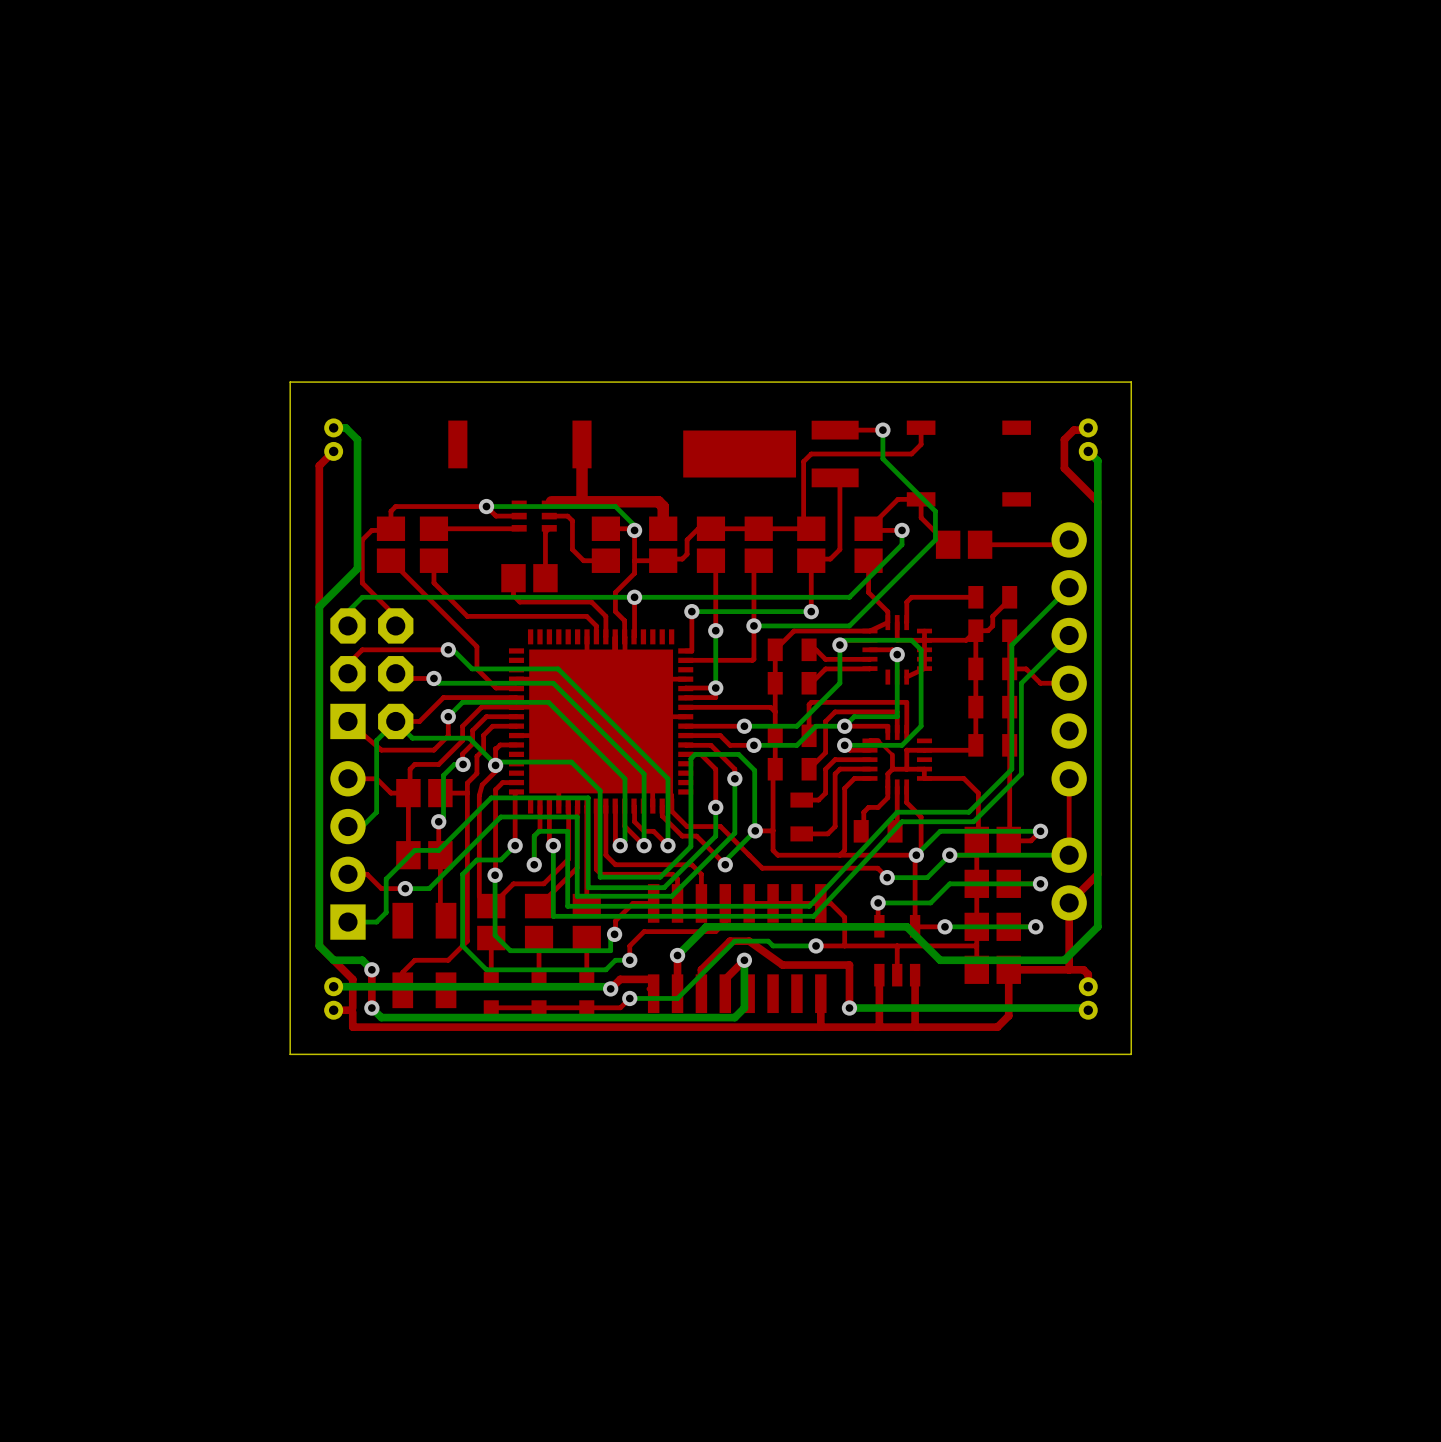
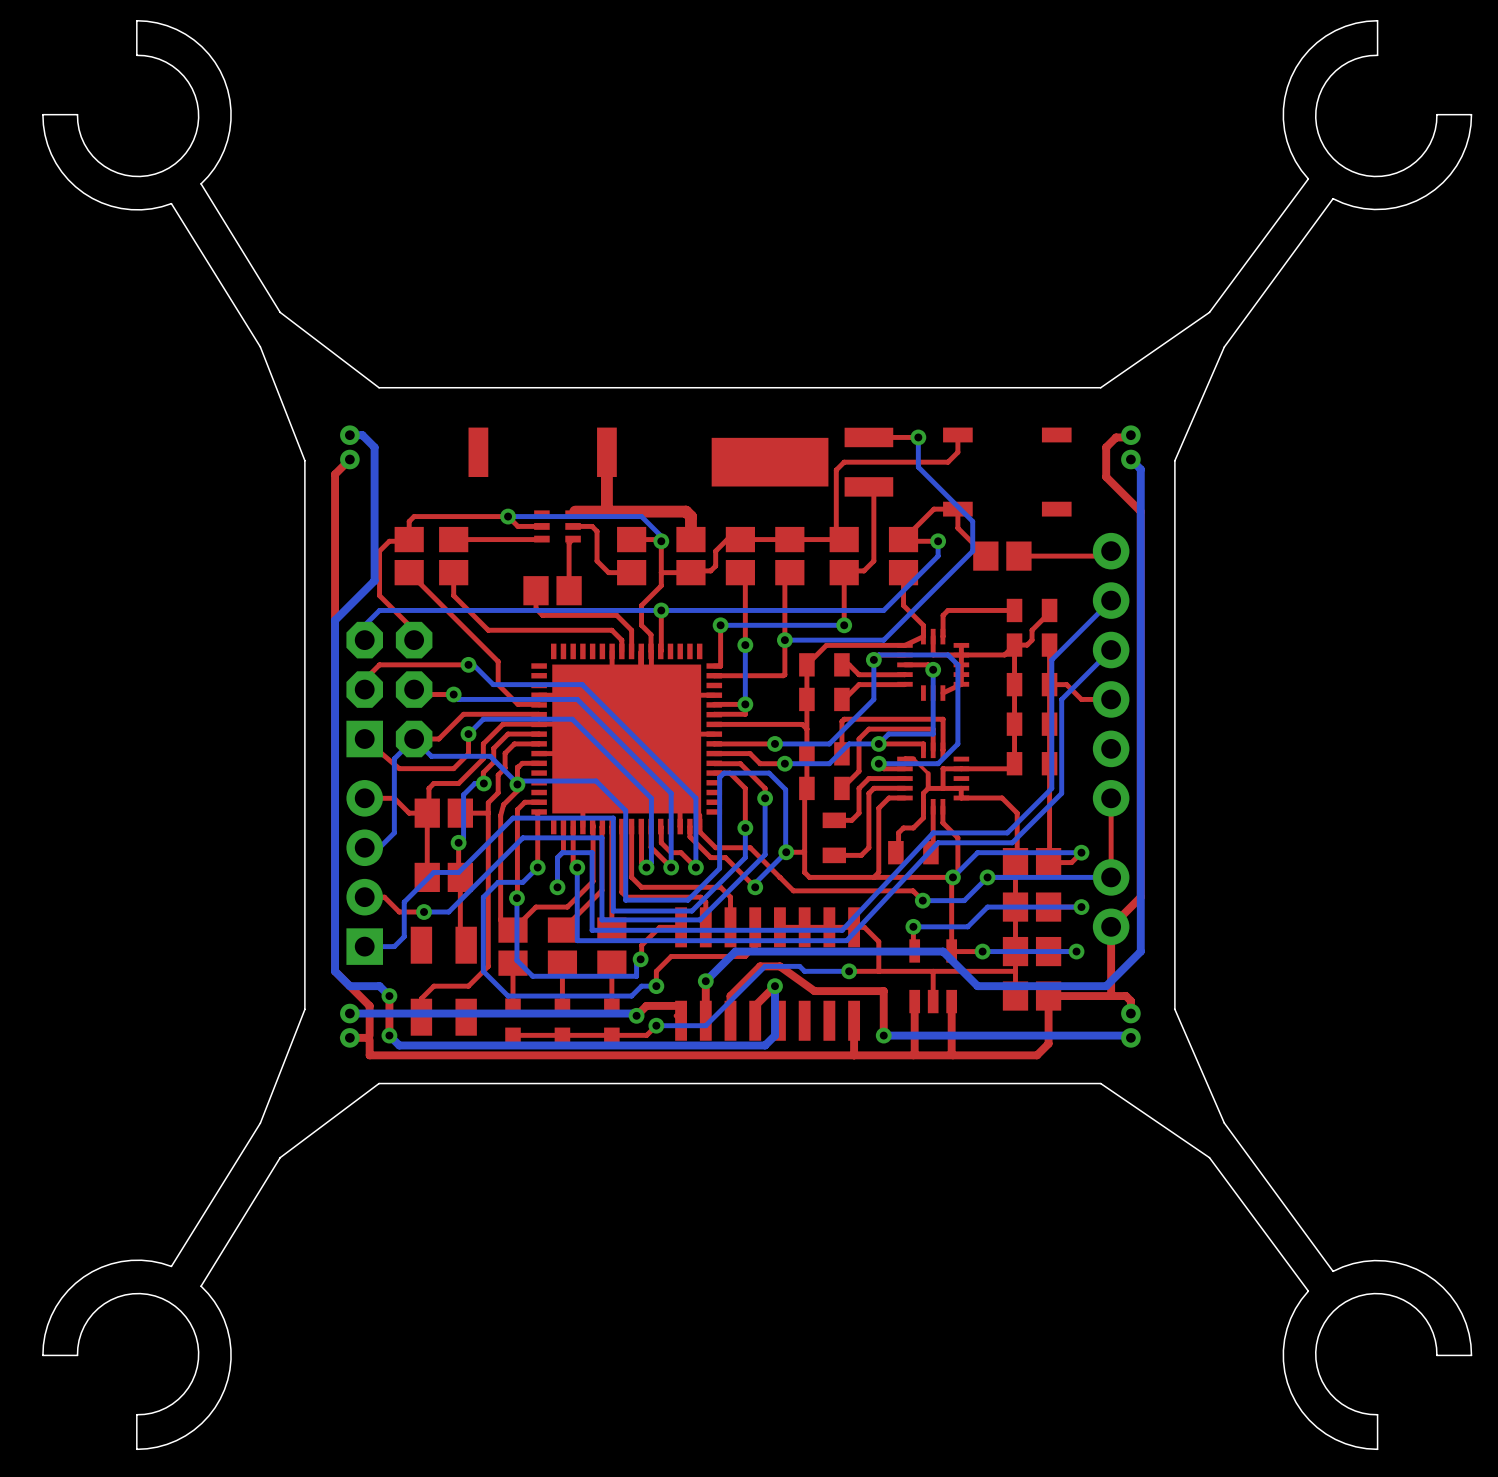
board edge: (361, 382) (290, 382) (290, 452) -> (379, 387) (280, 312) (201, 183) (214, 168) (224, 150) (230, 120) (227, 90) (215, 62) (194, 40) (176, 29) (157, 22) (136, 20) (136, 55) (159, 59) (172, 66) (188, 82) (195, 95) (198, 110) (197, 125) (193, 140) (185, 153) (168, 168) (155, 174) (132, 176) (117, 173) (104, 166) (88, 150) (81, 136) (77, 114) (42, 114) (47, 144) (61, 171) (75, 186) (92, 198) (111, 206) (131, 209) (151, 208) (171, 203) (260, 347) (304, 460)
board edge: (1059, 382) (1131, 382) (1131, 1054) (1059, 1054) -> (1100, 387) (1209, 312) (1308, 178) (1290, 151) (1284, 130) (1283, 108) (1287, 87) (1296, 67) (1309, 50) (1325, 36) (1355, 23) (1377, 20) (1377, 55) (1355, 59) (1335, 70) (1322, 88) (1317, 102) (1316, 125) (1320, 140) (1328, 153) (1345, 168) (1366, 175) (1381, 176) (1396, 173) (1410, 166) (1426, 150) (1433, 136) (1436, 114) (1471, 114) (1469, 136) (1461, 156) (1443, 182) (1426, 195) (1406, 204) (1385, 209) (1363, 208) (1333, 198) (1224, 347) (1174, 460) (1174, 1009) (1224, 1123) (1333, 1271) (1363, 1261) (1385, 1260) (1406, 1265) (1426, 1274) (1443, 1287) (1461, 1313) (1469, 1333) (1471, 1355) (1436, 1355) (1433, 1333) (1426, 1319) (1410, 1303) (1396, 1297) (1381, 1293) (1366, 1294) (1345, 1302) (1328, 1316) (1320, 1329) (1316, 1344) (1317, 1367) (1322, 1381) (1335, 1399) (1355, 1410) (1377, 1414) (1377, 1449) (1355, 1446) (1325, 1434) (1309, 1420) (1296, 1402) (1287, 1382) (1283, 1361) (1284, 1339) (1290, 1318) (1308, 1291) (1209, 1157) (1100, 1083)
board edge: (290, 982) (290, 1054) (361, 1054) -> (304, 1009) (260, 1123) (171, 1266) (151, 1261) (131, 1260) (111, 1263) (92, 1271) (75, 1283) (61, 1298) (47, 1325) (42, 1355) (77, 1355) (81, 1333) (88, 1319) (104, 1303) (117, 1297) (132, 1293) (155, 1296) (168, 1302) (185, 1316) (193, 1329) (197, 1344) (198, 1359) (195, 1374) (188, 1387) (172, 1404) (159, 1410) (136, 1414) (136, 1449) (157, 1447) (176, 1440) (194, 1430) (215, 1407) (227, 1379) (230, 1349) (224, 1319) (214, 1301) (201, 1286) (280, 1157) (379, 1083)

